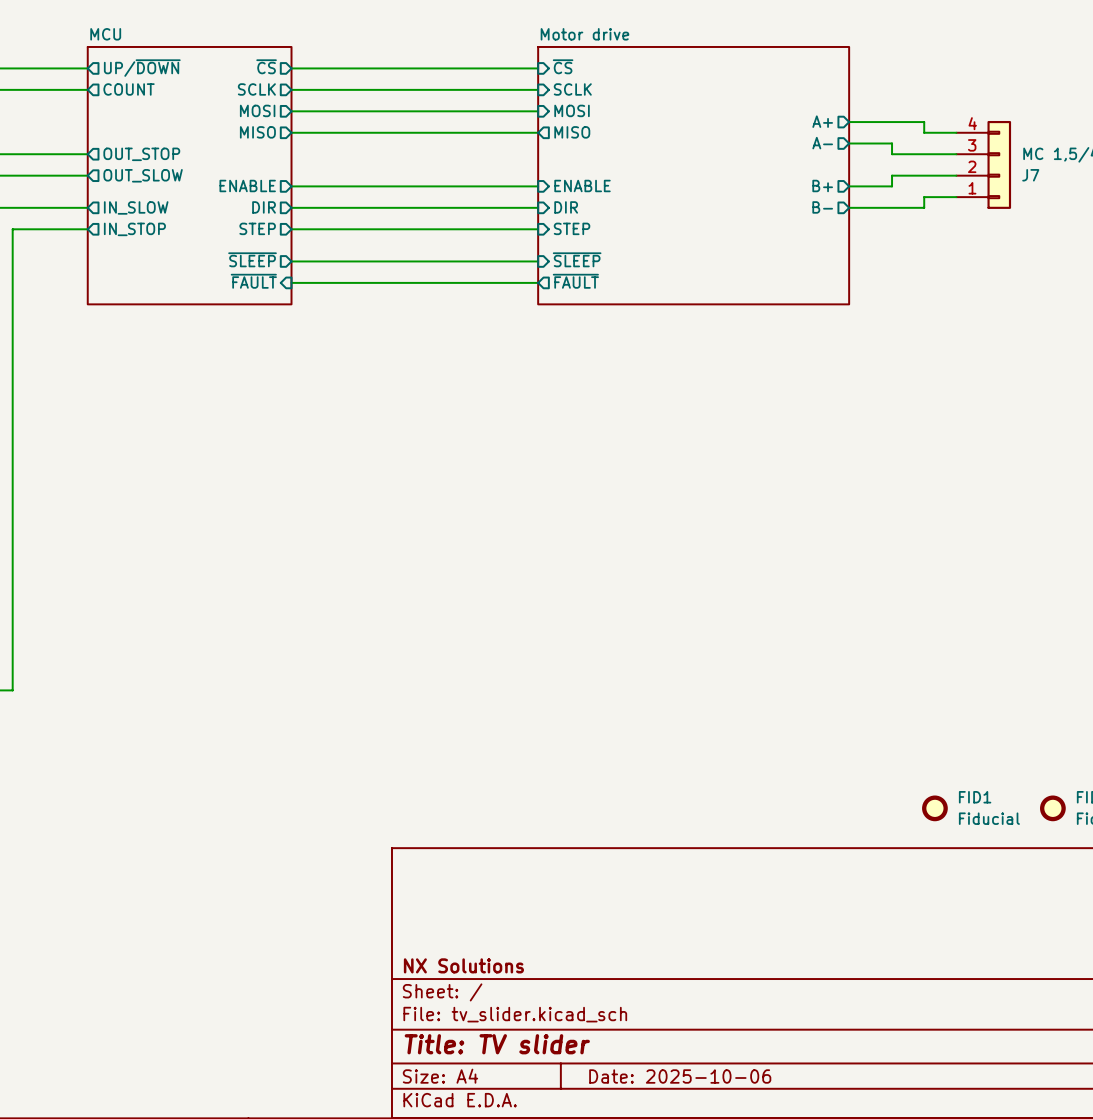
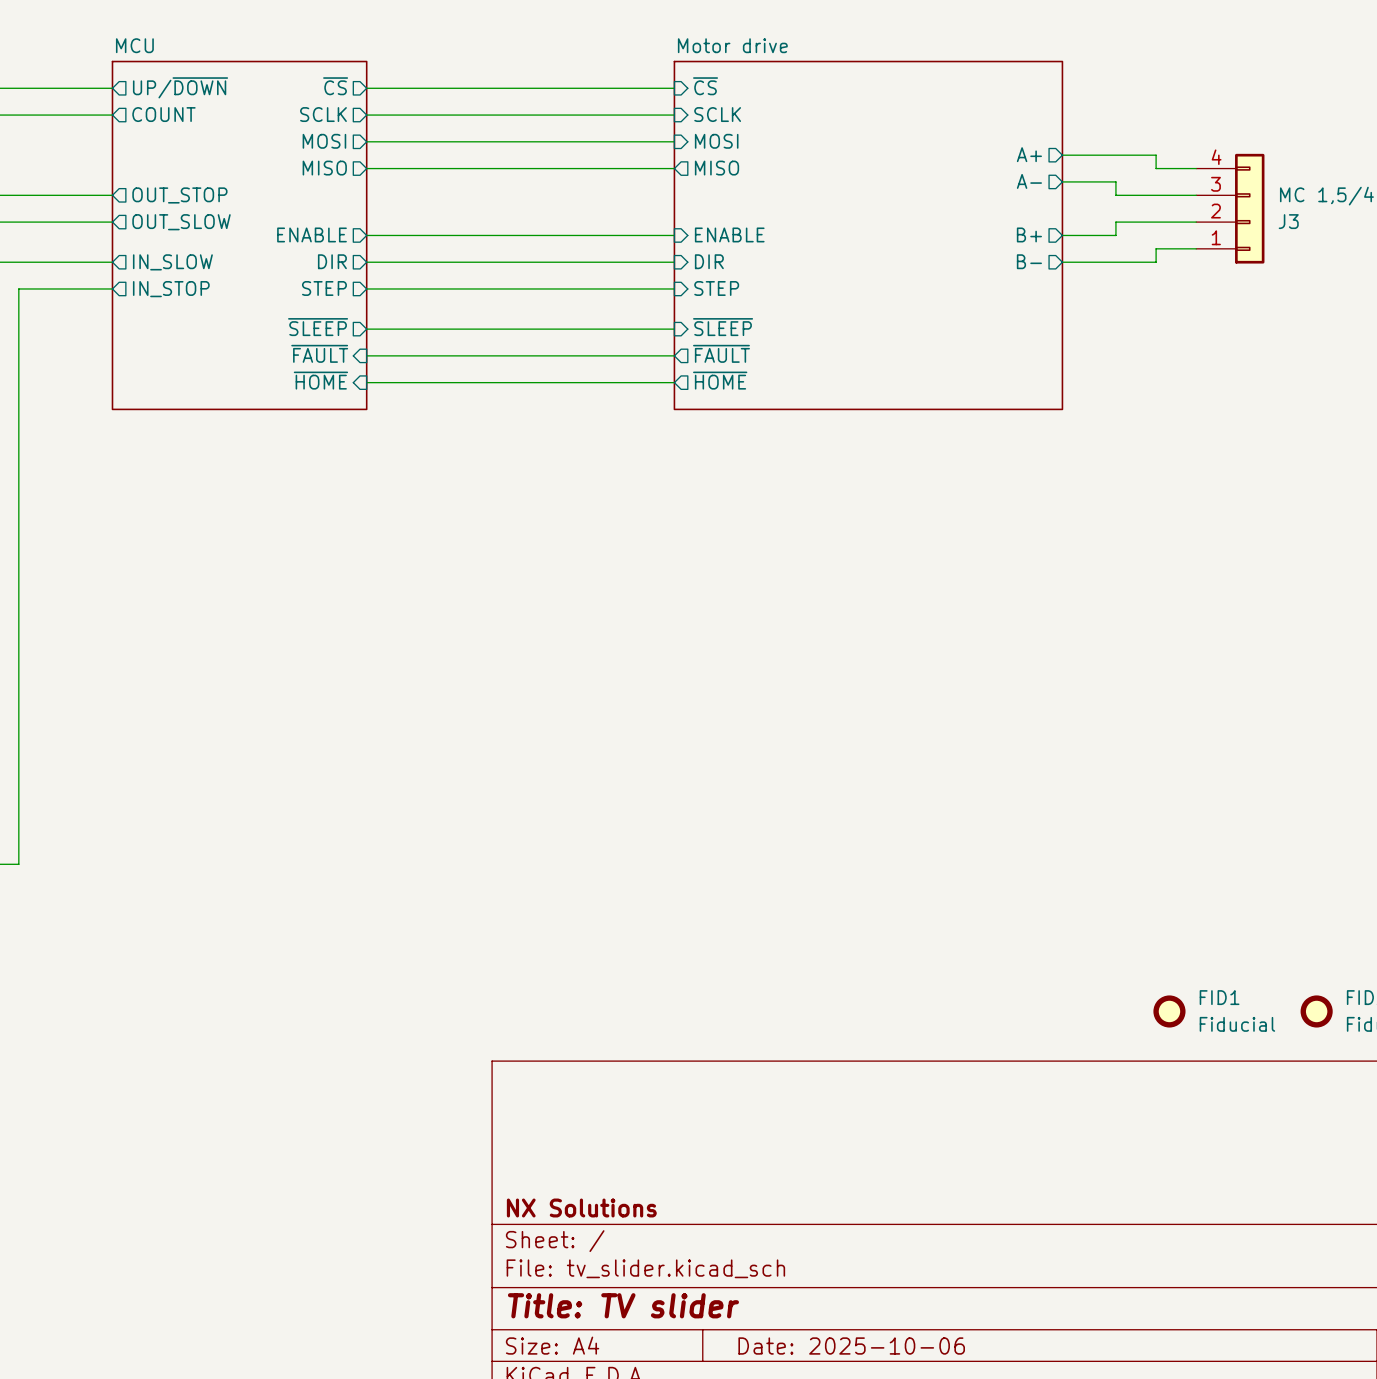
sheet MCU: (189, 175) -> none
sheet Motor drive: (693, 175) -> none
J7 name: J7 (1030, 175) -> J3 (1288, 221)
sheet MCU: none -> (239, 235)
sheet Motor drive: none -> (868, 235)
sheet pin: none -> ~{HOME} (320, 380)
sheet pin: none -> ~{HOME} (720, 380)
wire: none -> (366, 382) (674, 382)

